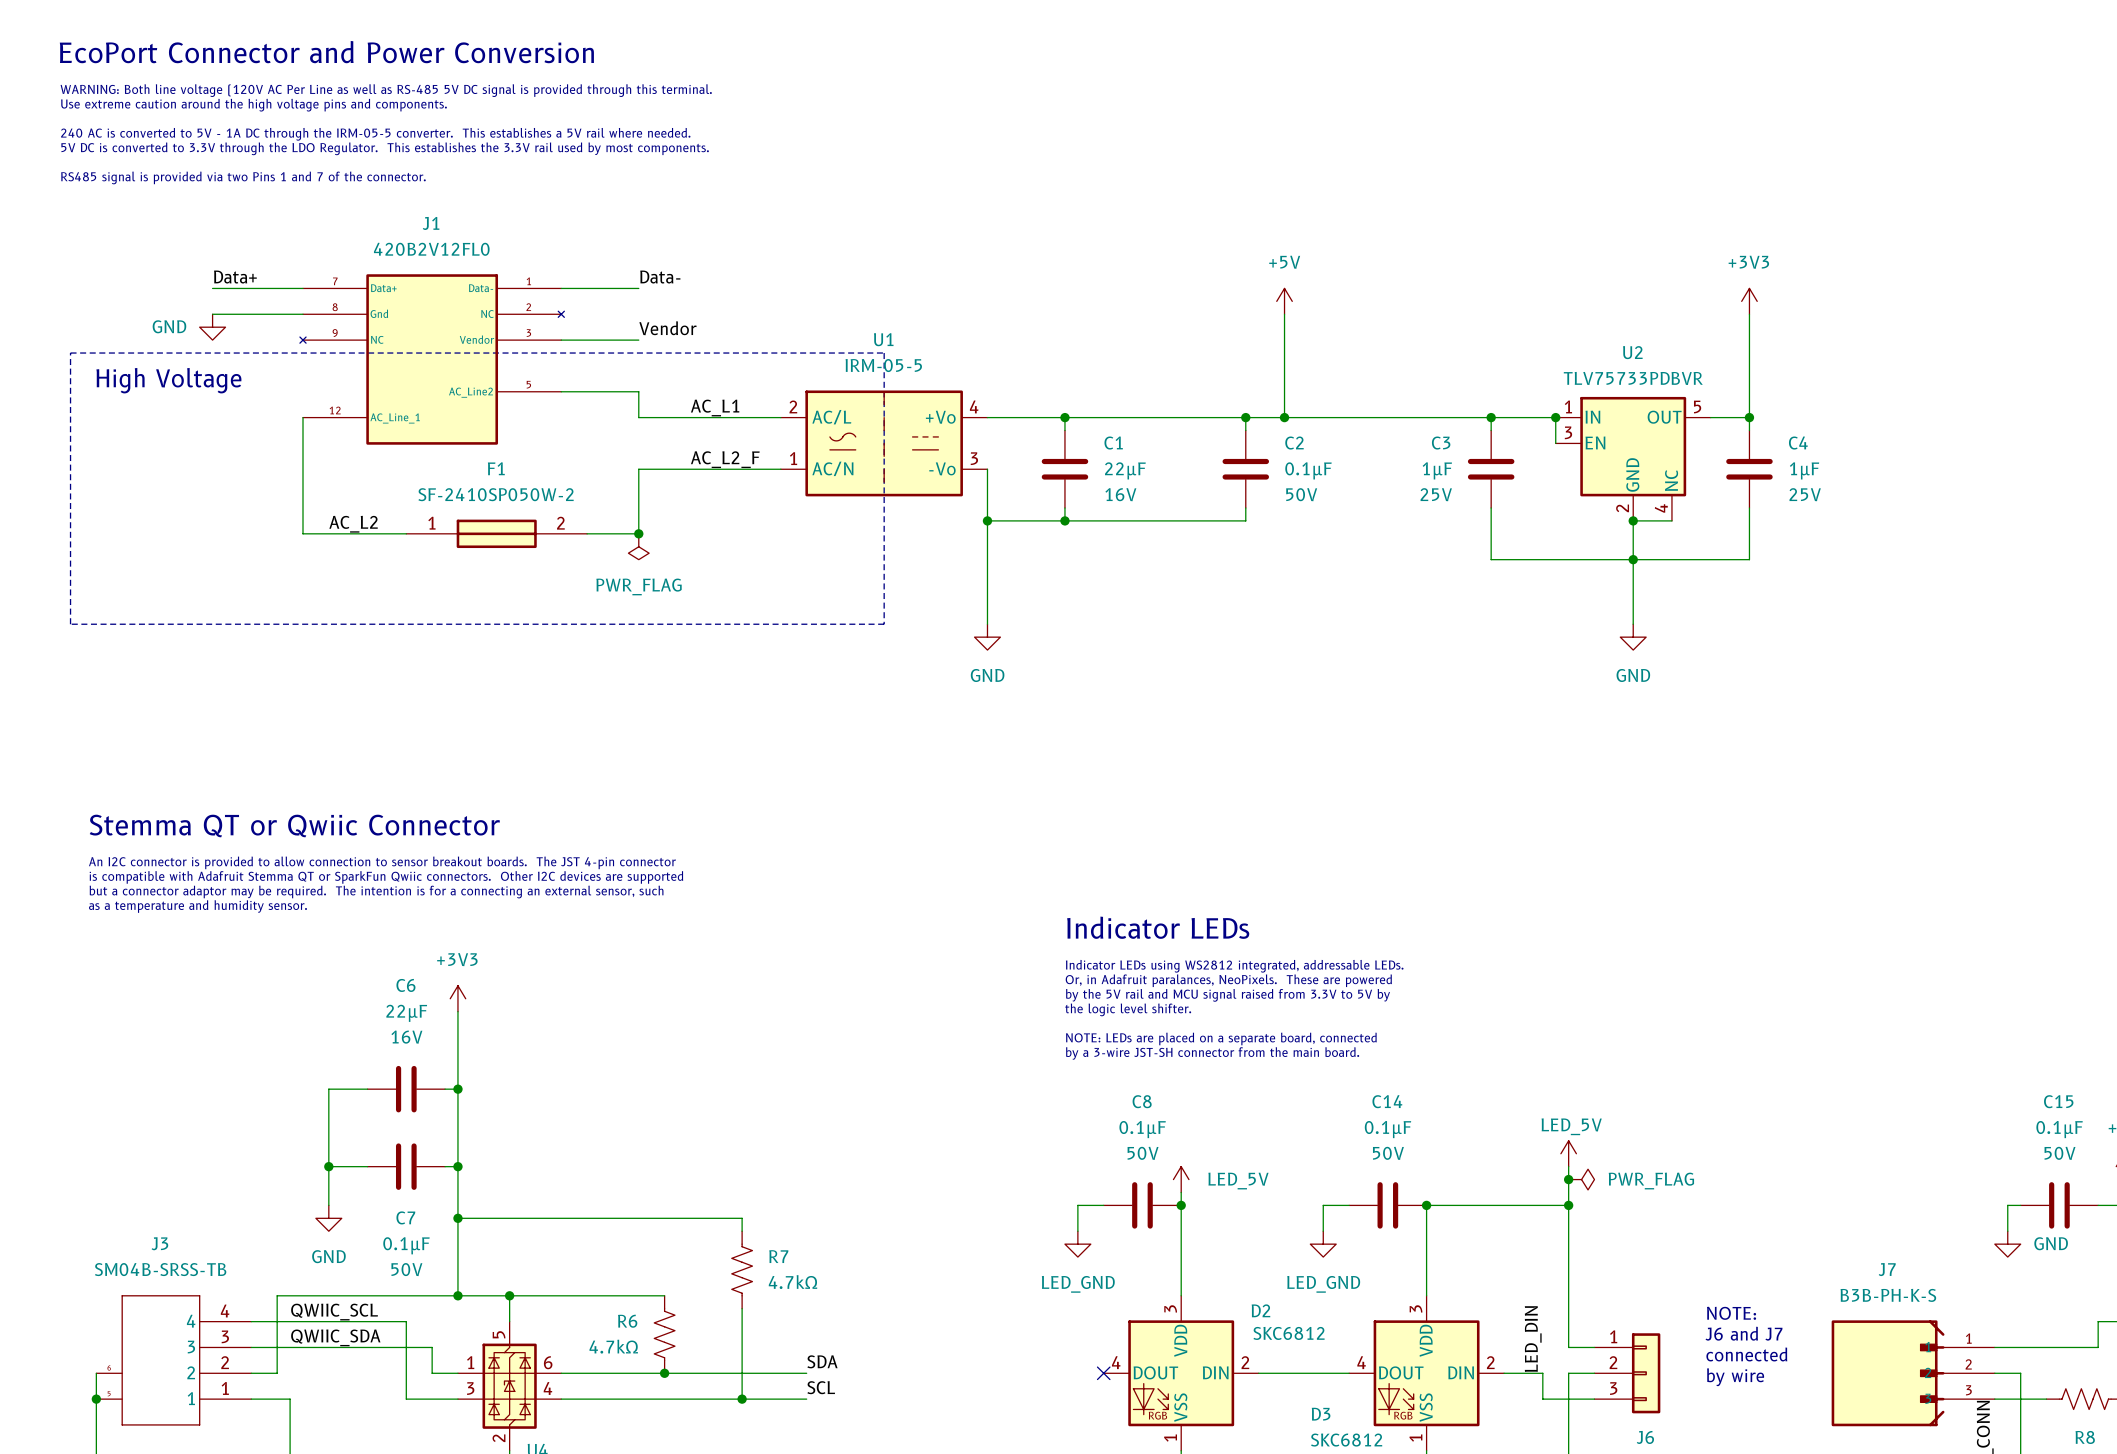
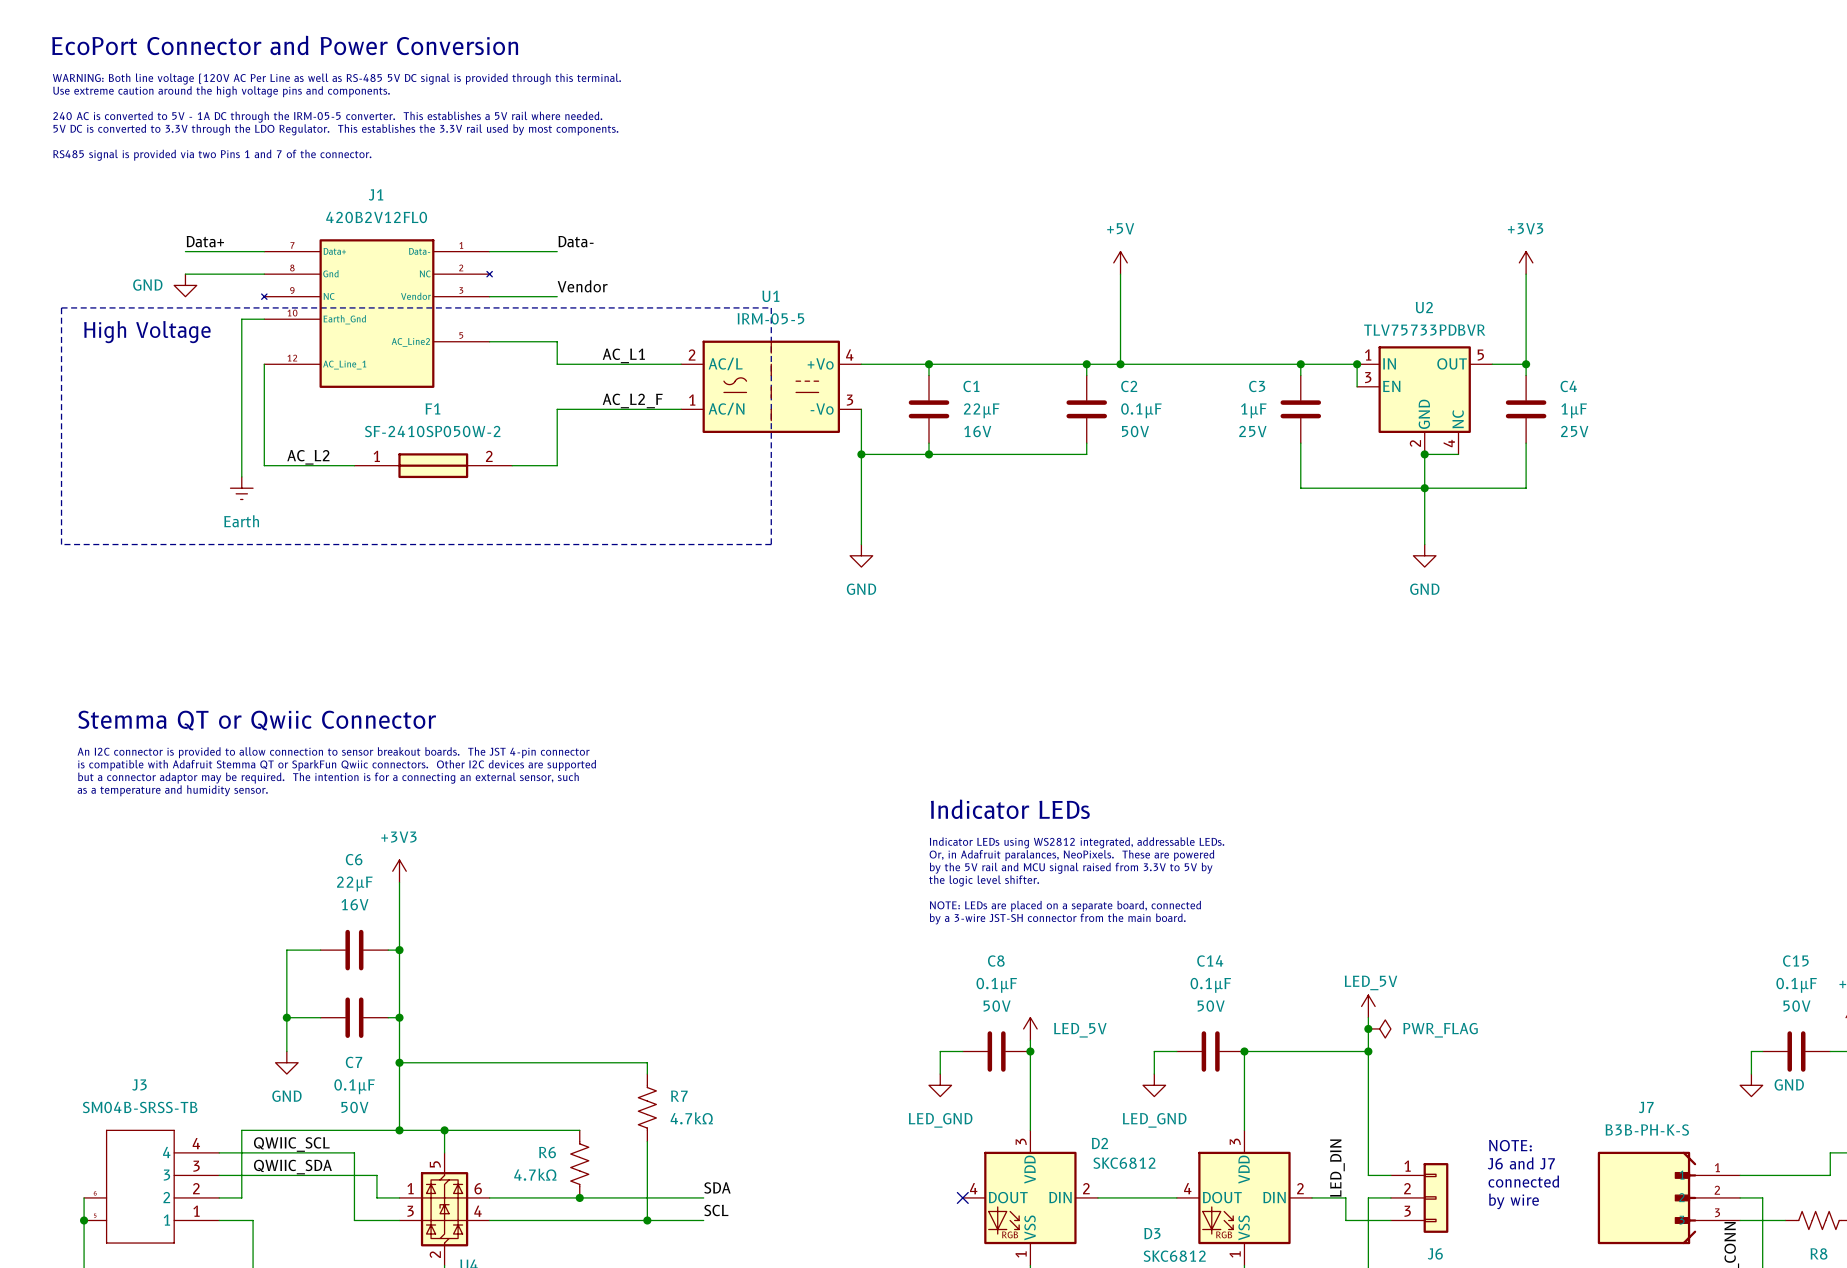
J1 symbol: [299, 274, 565, 445] -> [261, 239, 493, 388]
wire: none -> (264, 319) (241, 319) (241, 476)
junction: (638, 533) -> none
power symbol: PWR_FLAG (638, 546) -> none
power symbol: none -> Earth (241, 488)

